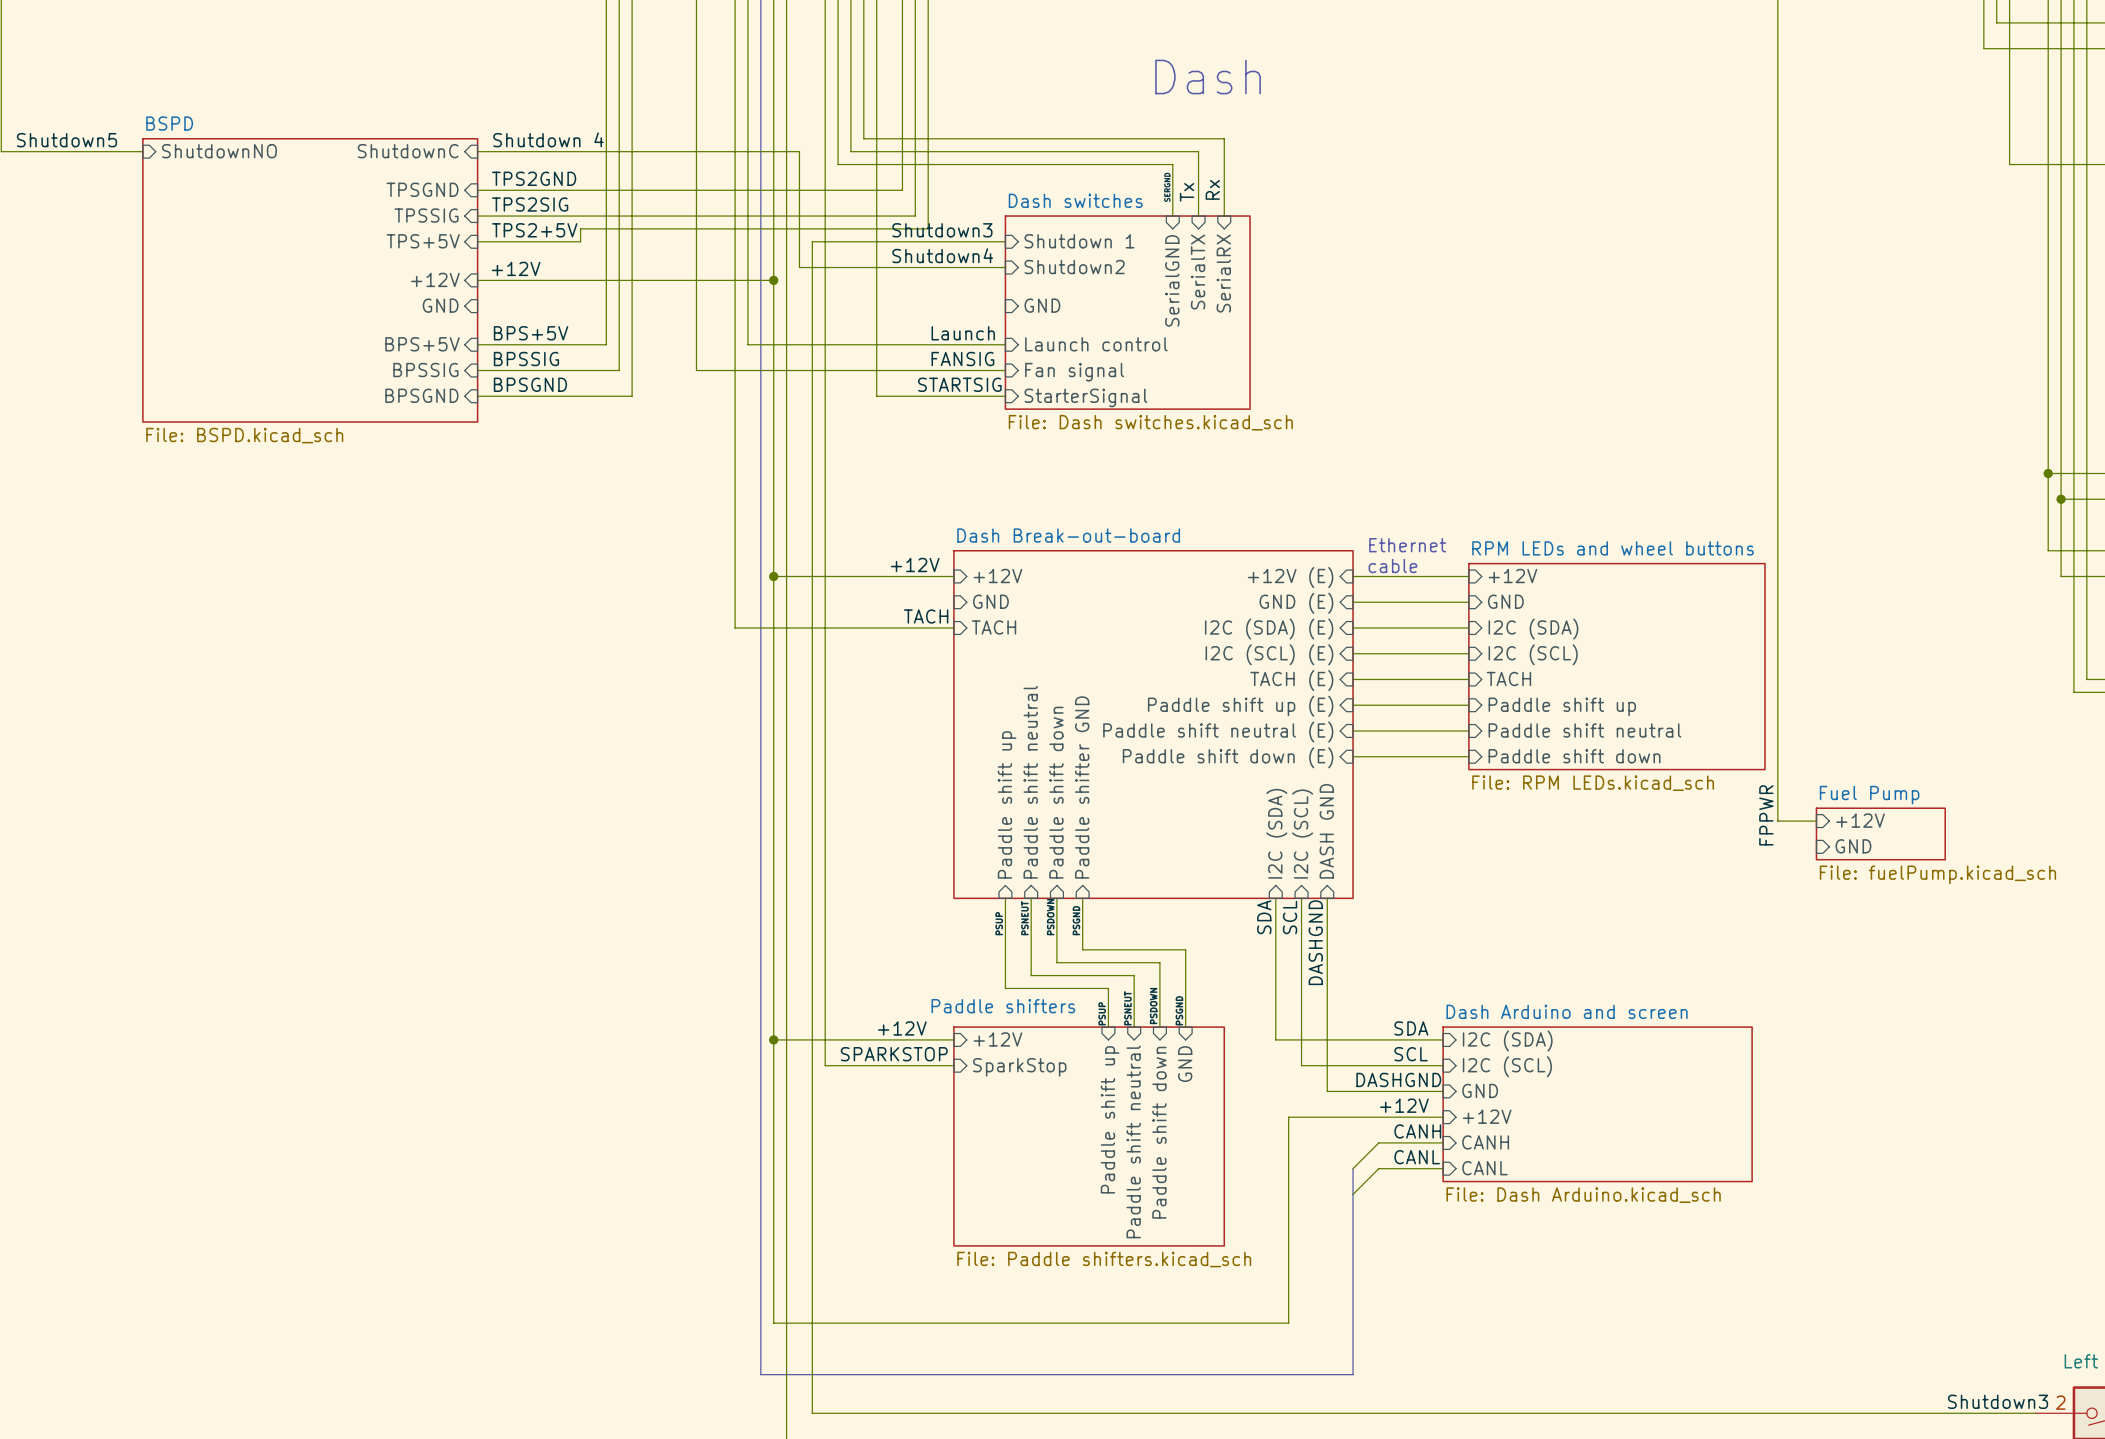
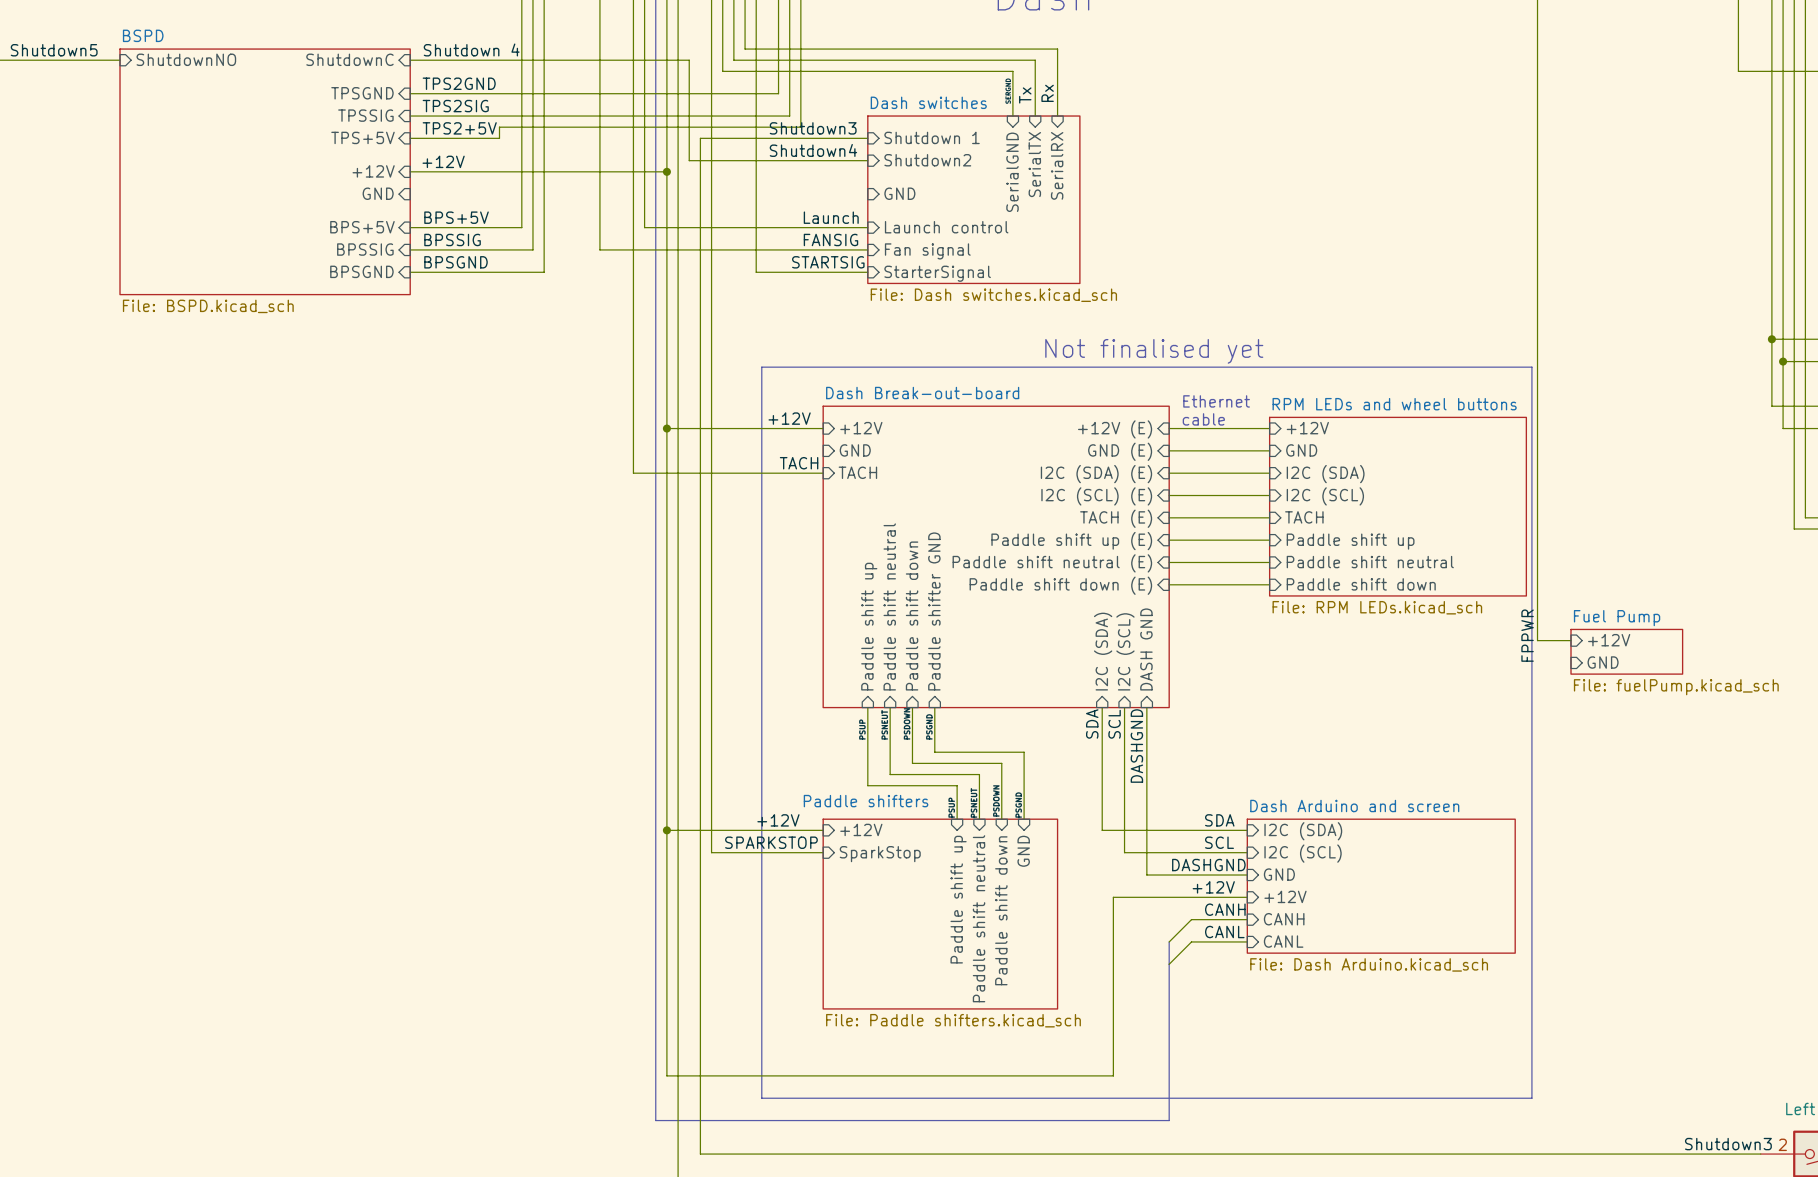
text: none -> Not finalised yet (1154, 351)
line: none -> (761, 367) (761, 1098) (1531, 1098) (1531, 367) (761, 367)

